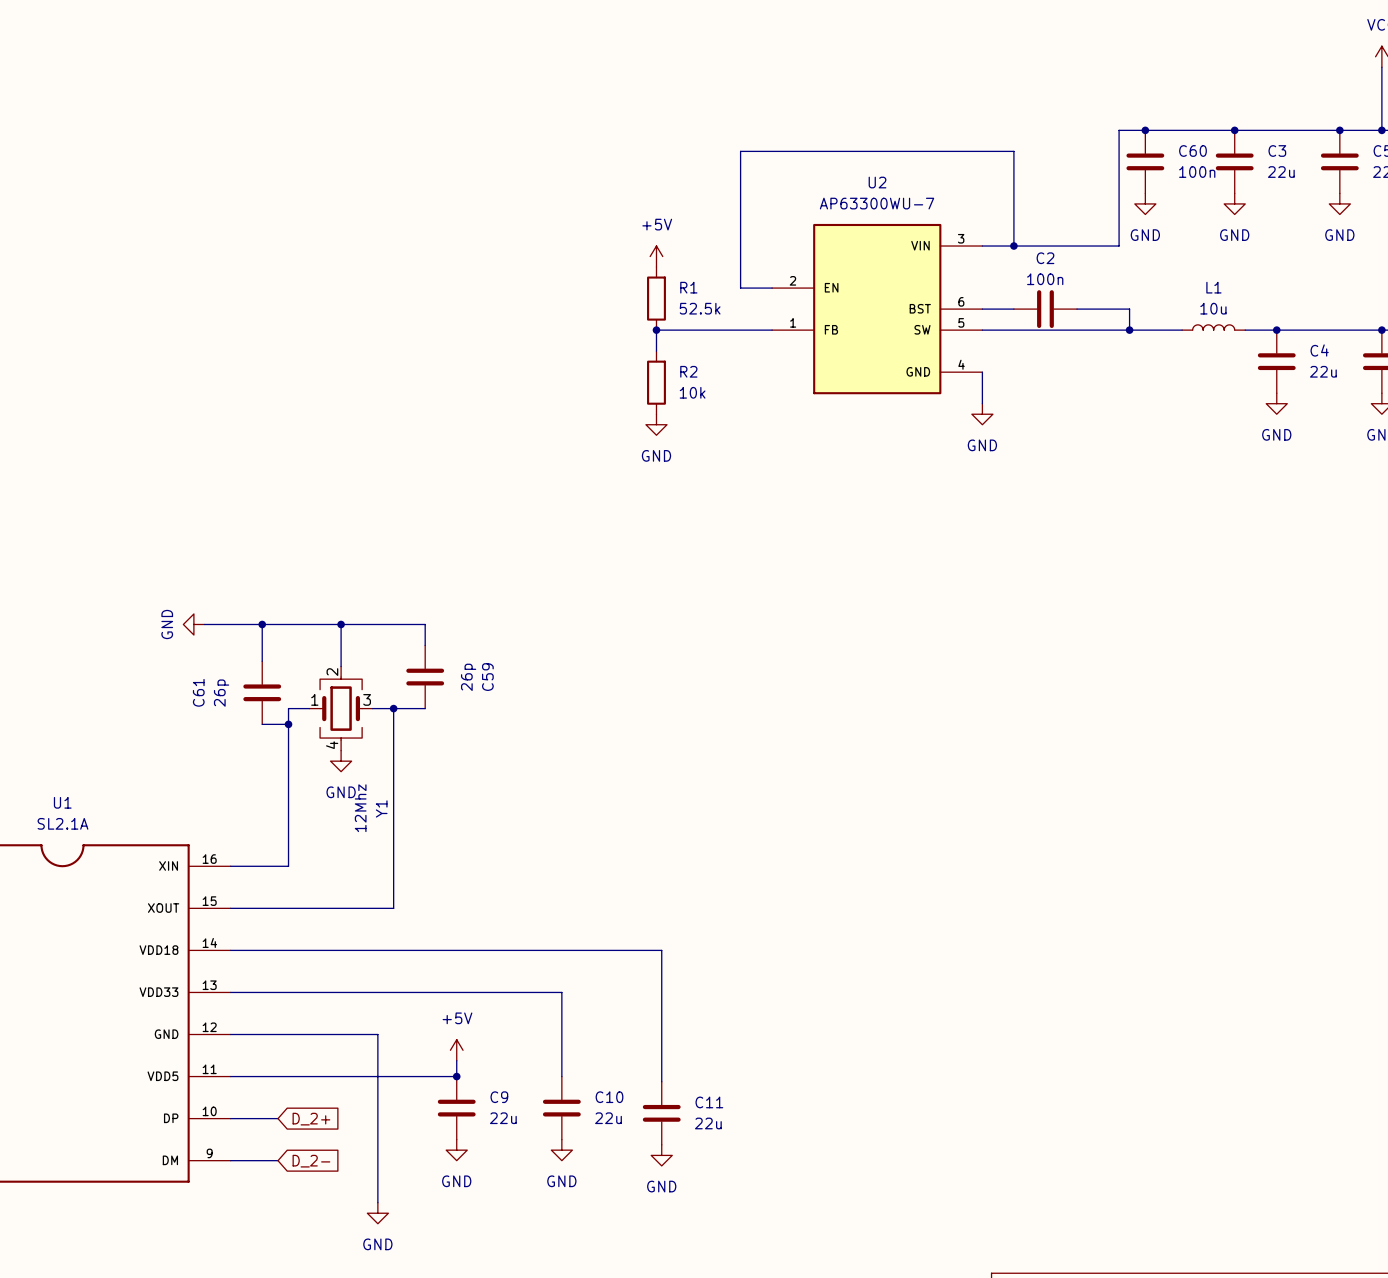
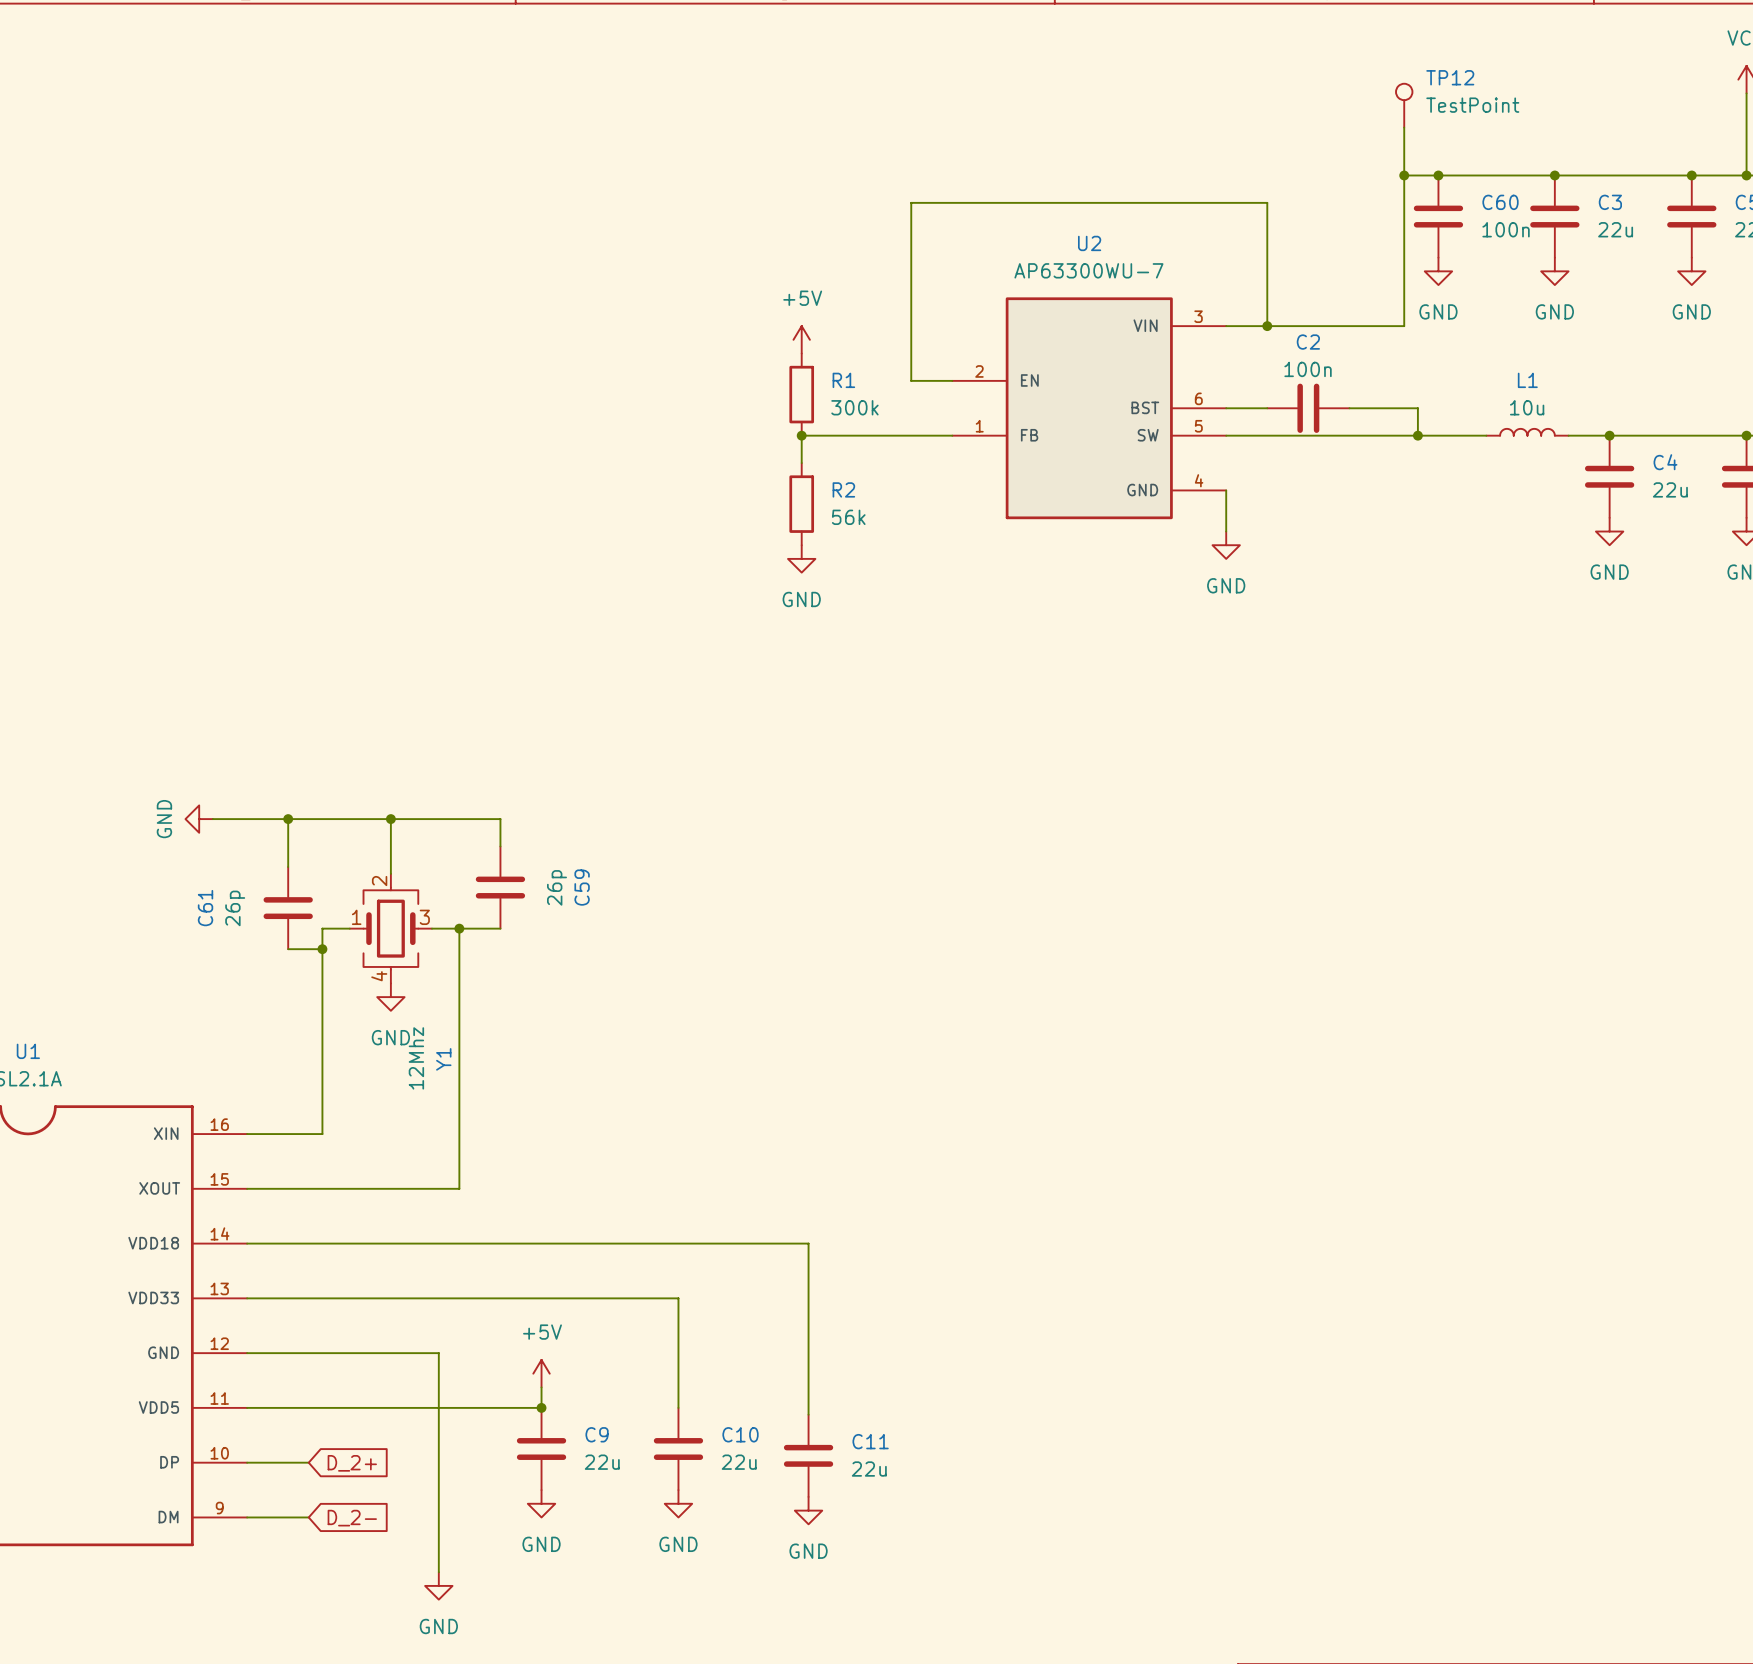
TP12: none -> TestPoint (1404, 105)
wire: none -> (1404, 127) (1404, 175)
junction: none -> (1404, 175)
R1 value: 52.5k (700, 308) -> 300k (854, 407)
R2 value: 10k (692, 392) -> 56k (848, 517)

